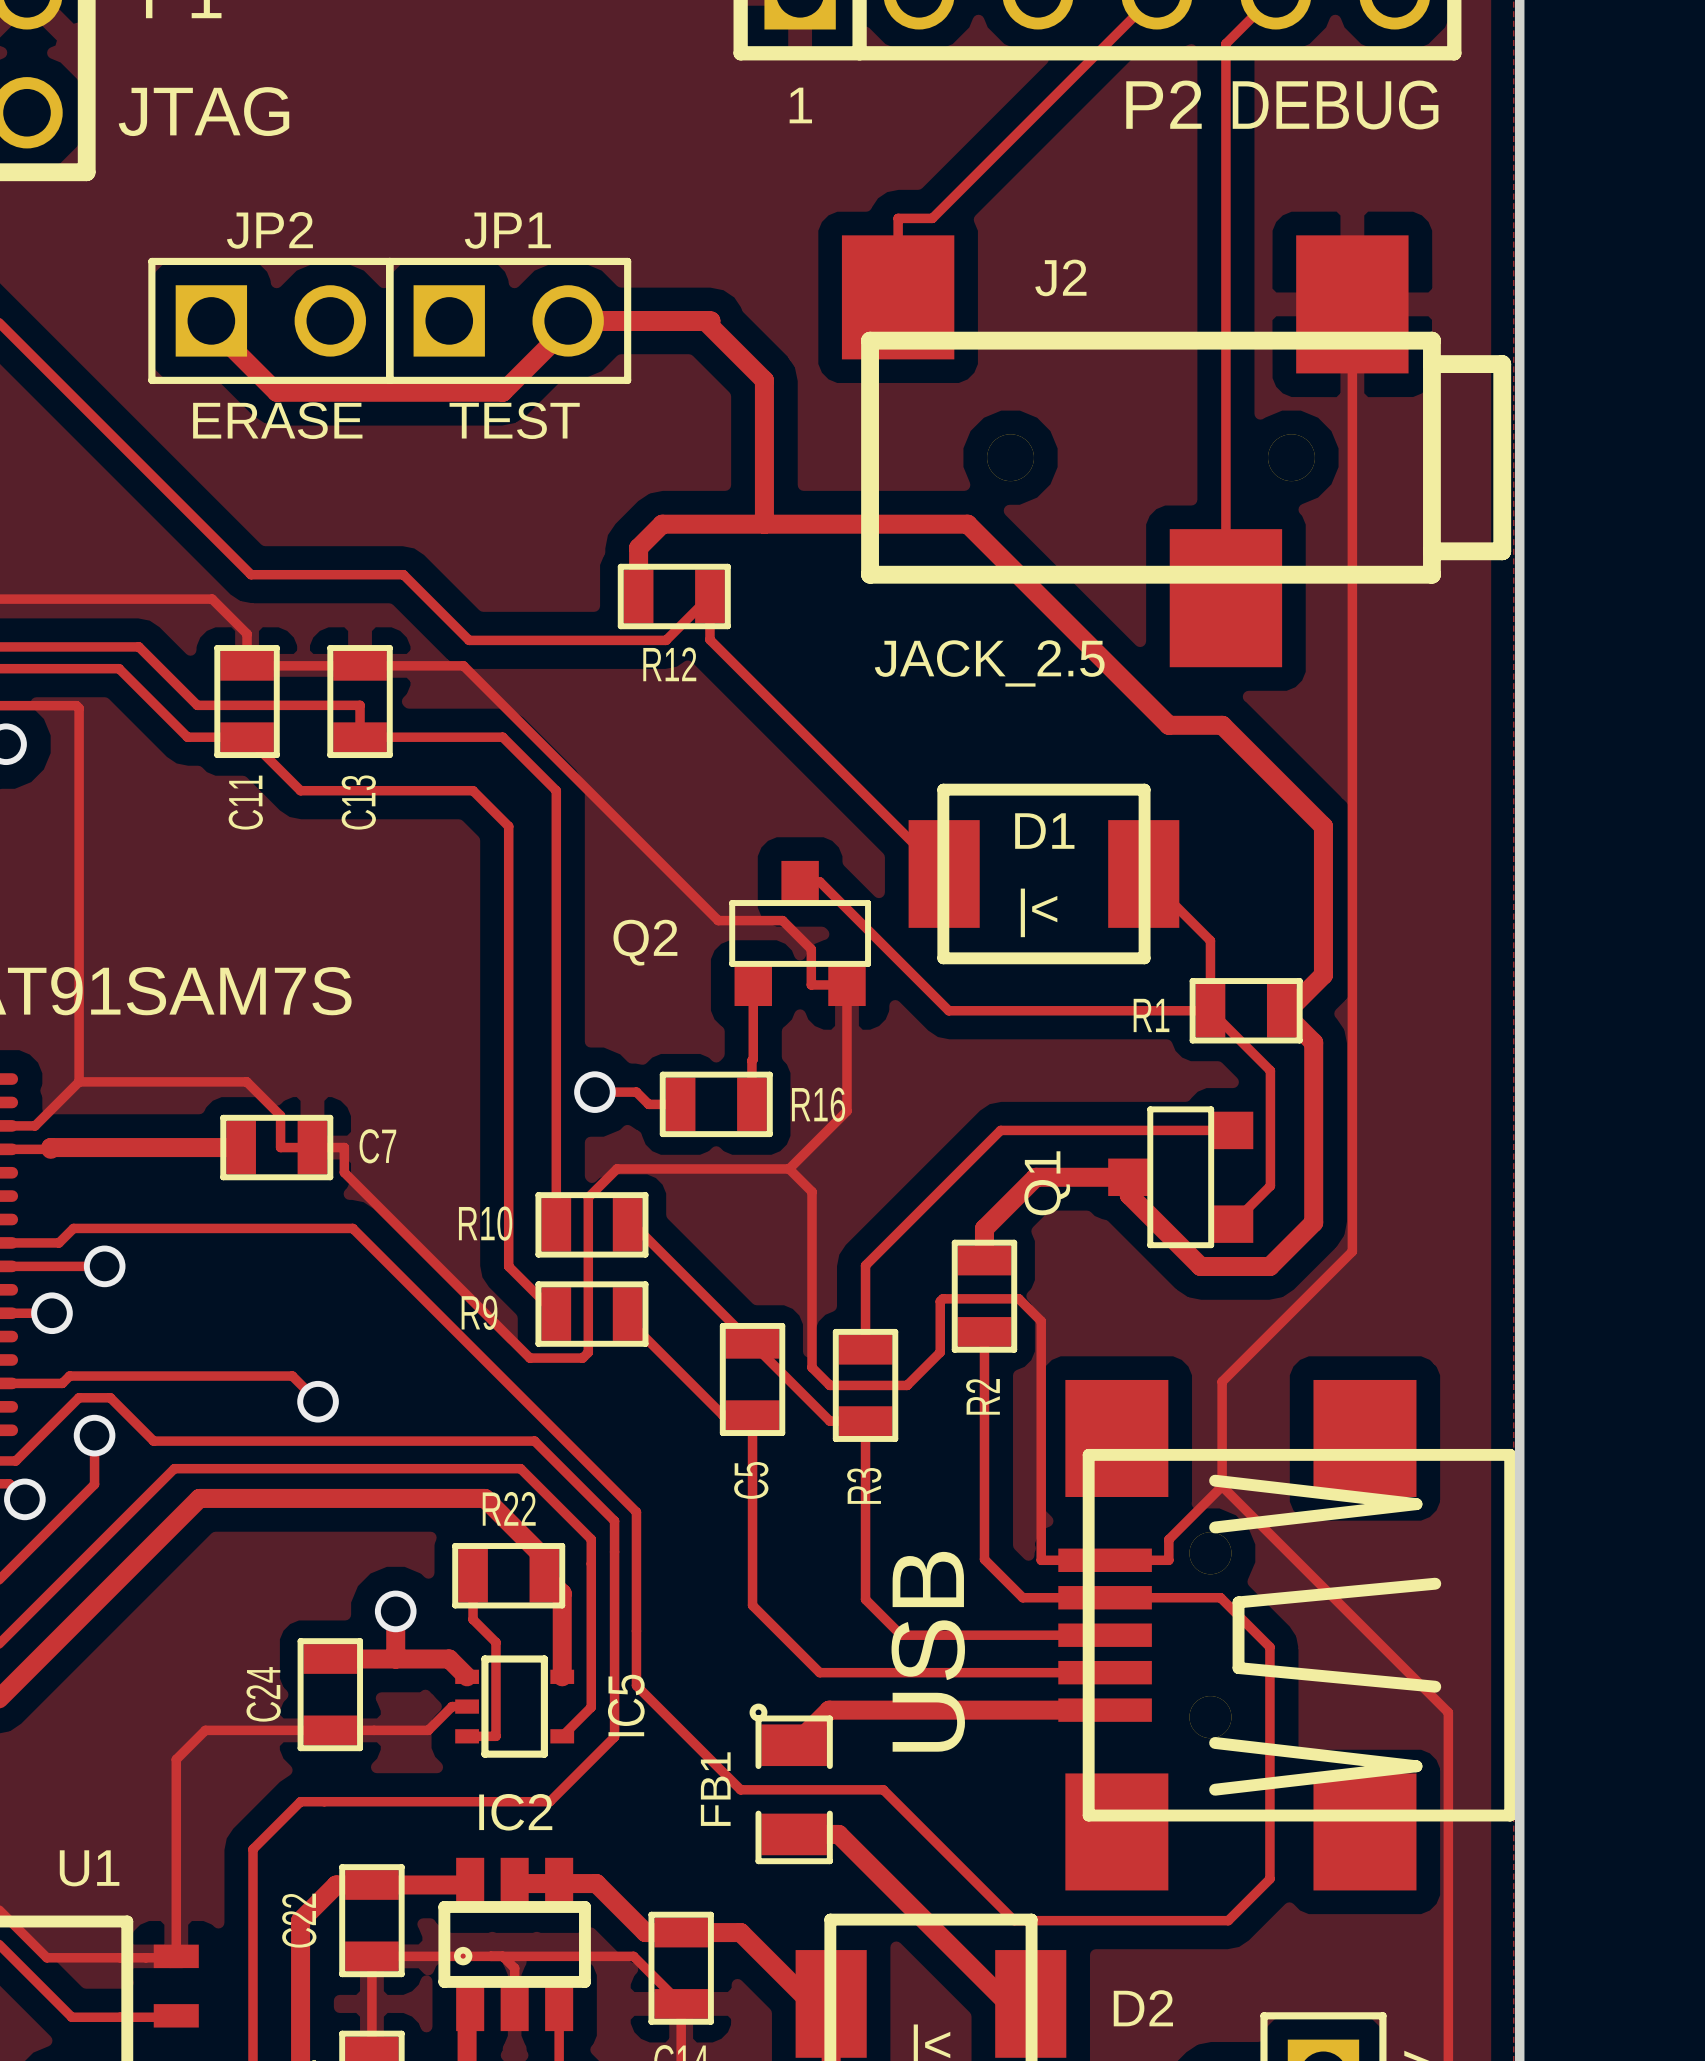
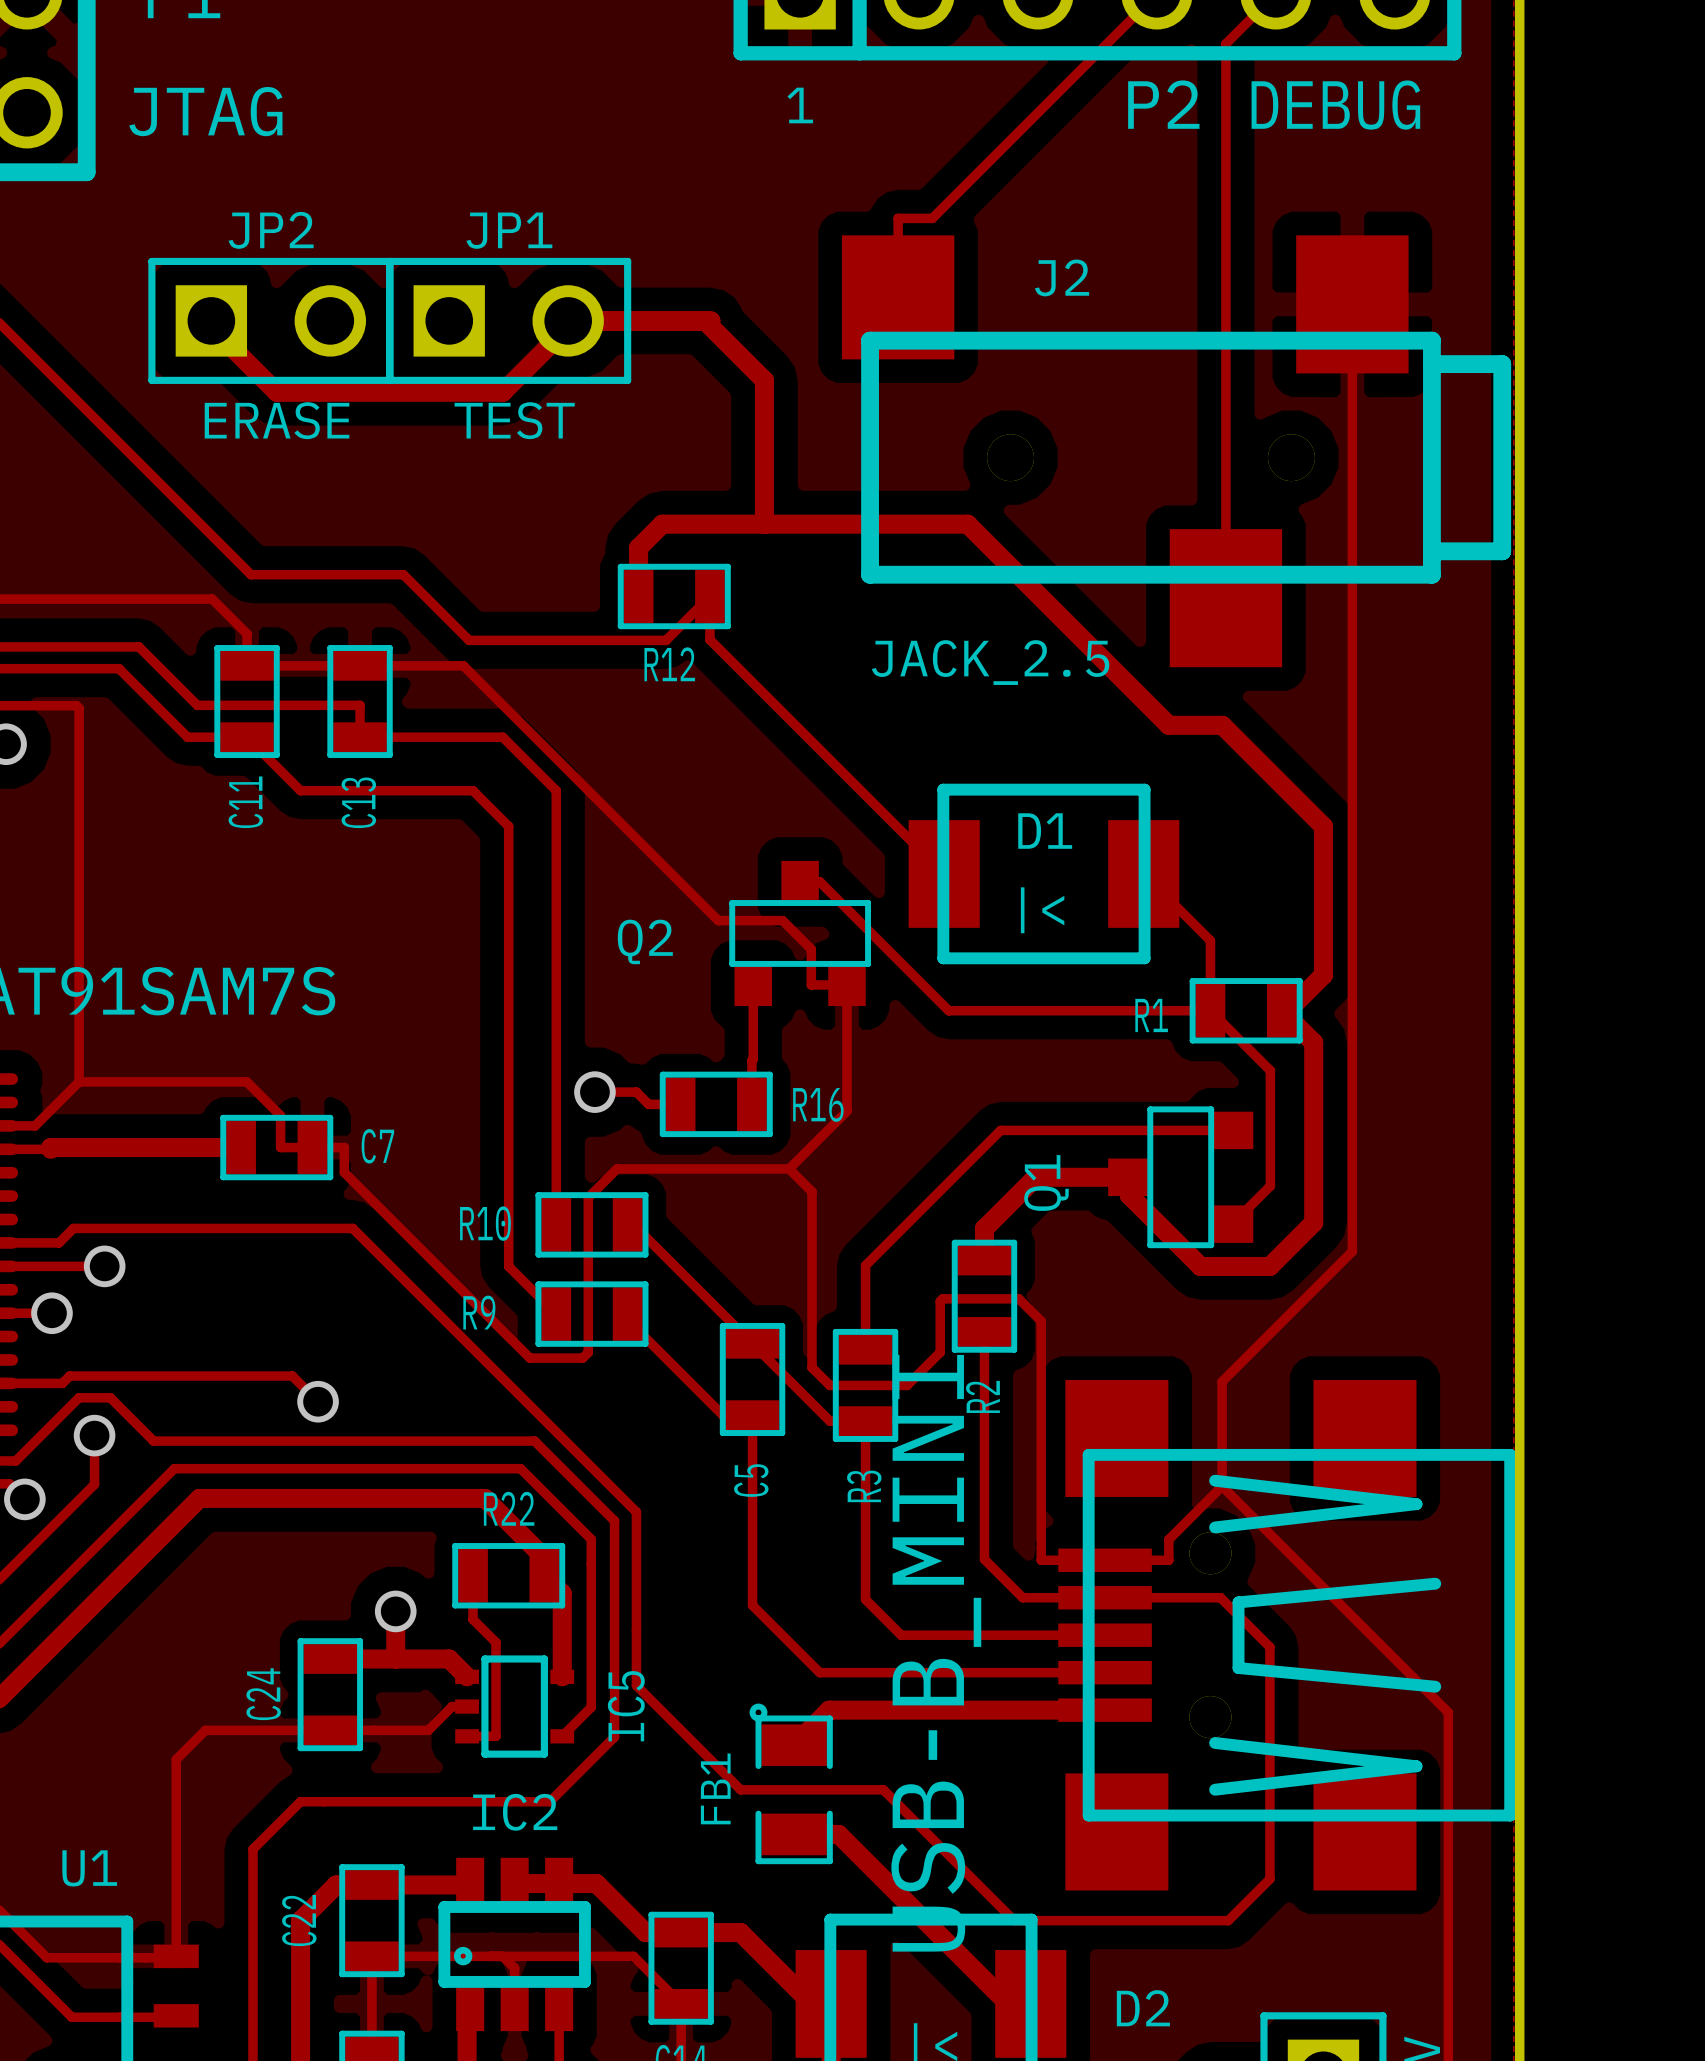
part value: USB (928, 1651) -> USB-B_MINI (936, 1653)

